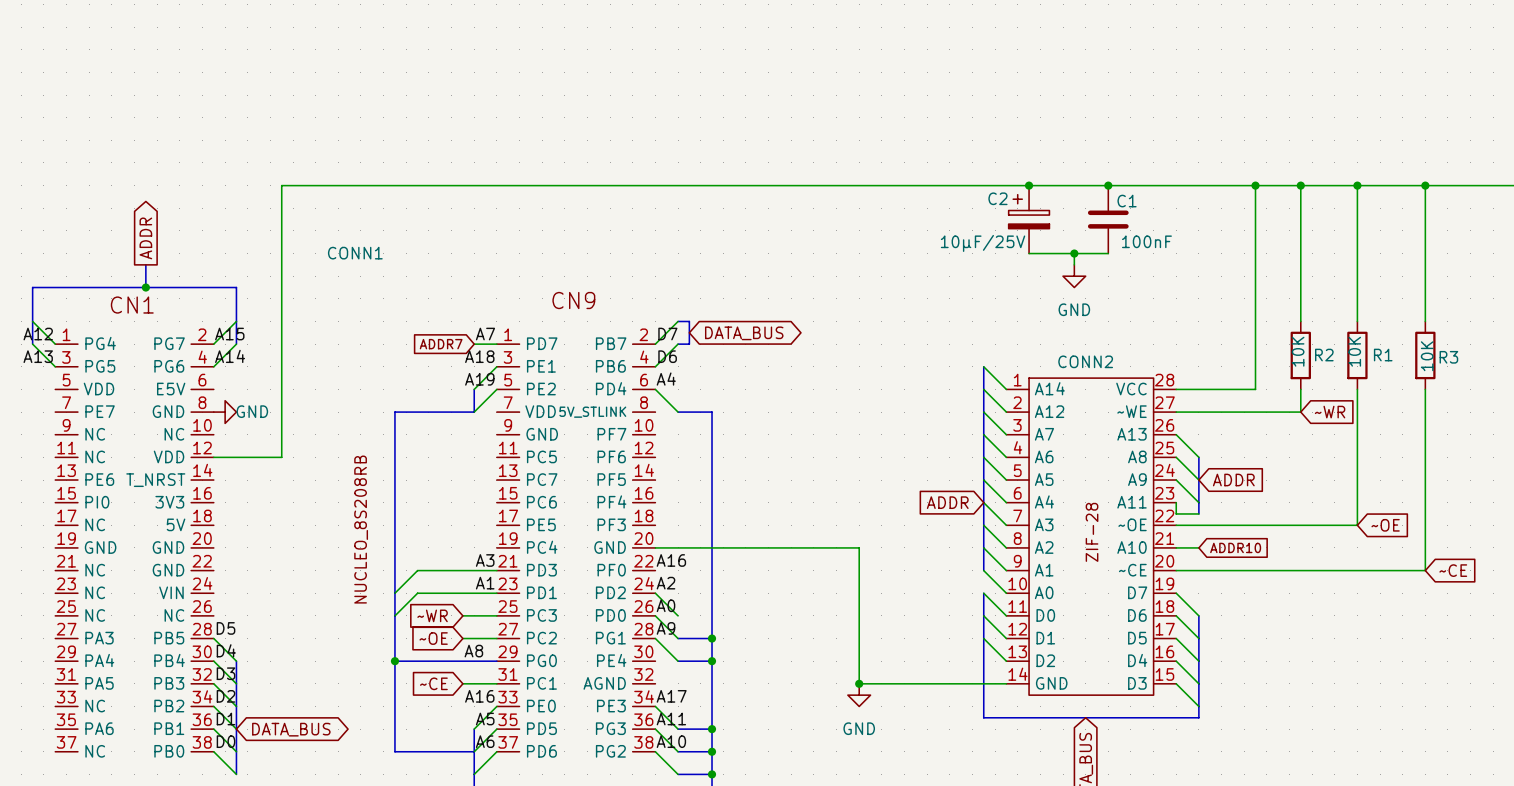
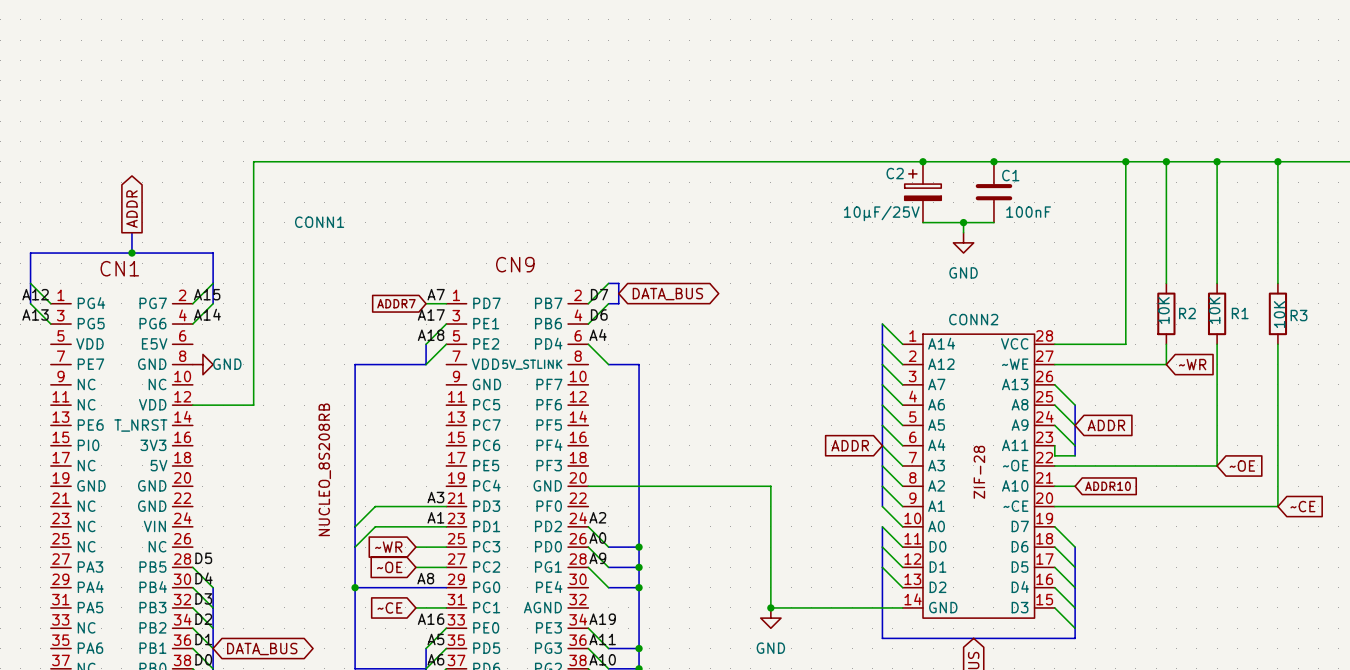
label: A18 (479, 356) -> A17 (431, 314)
label: A19 (479, 379) -> A18 (431, 335)
label: A16 (671, 560) -> none
bus: none -> (608, 547) (639, 547)
junction: none -> (639, 547)
label: A17 (671, 696) -> A19 (602, 619)

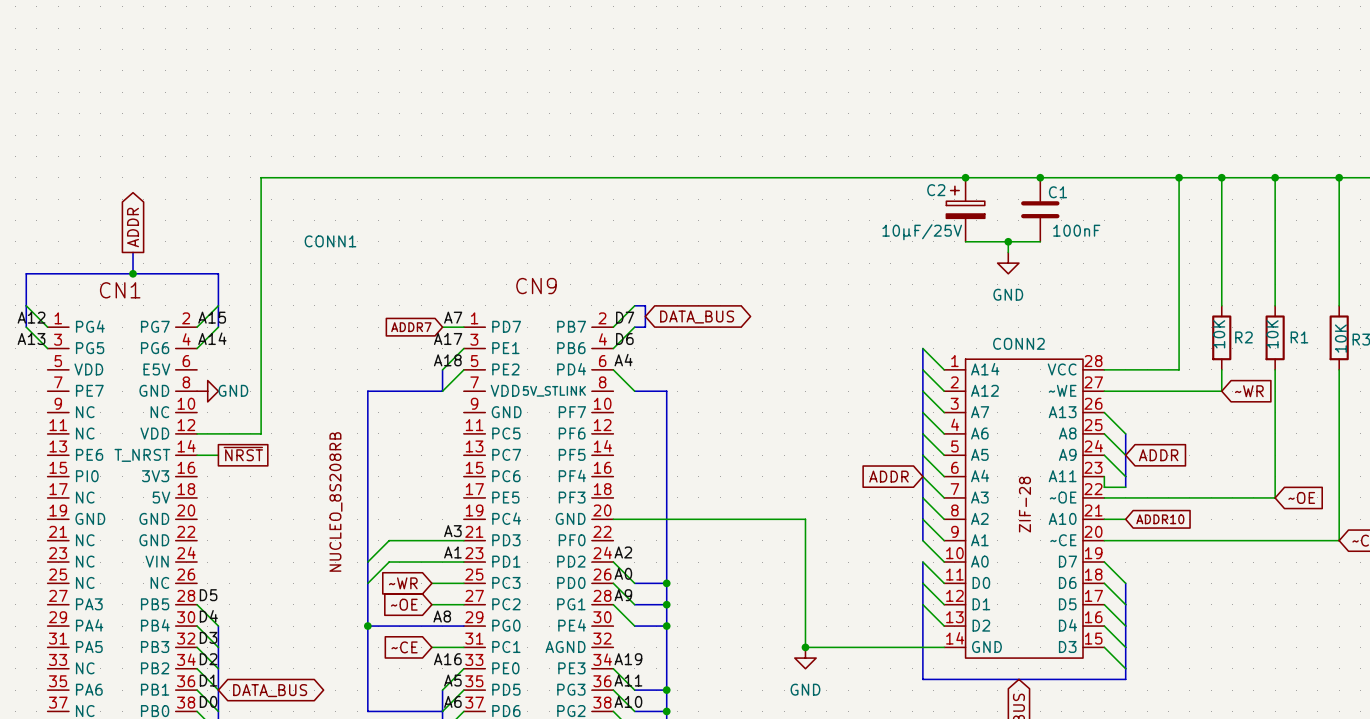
global label: none -> ~{NRST} (243, 454)
wire: none -> (197, 455) (218, 455)

